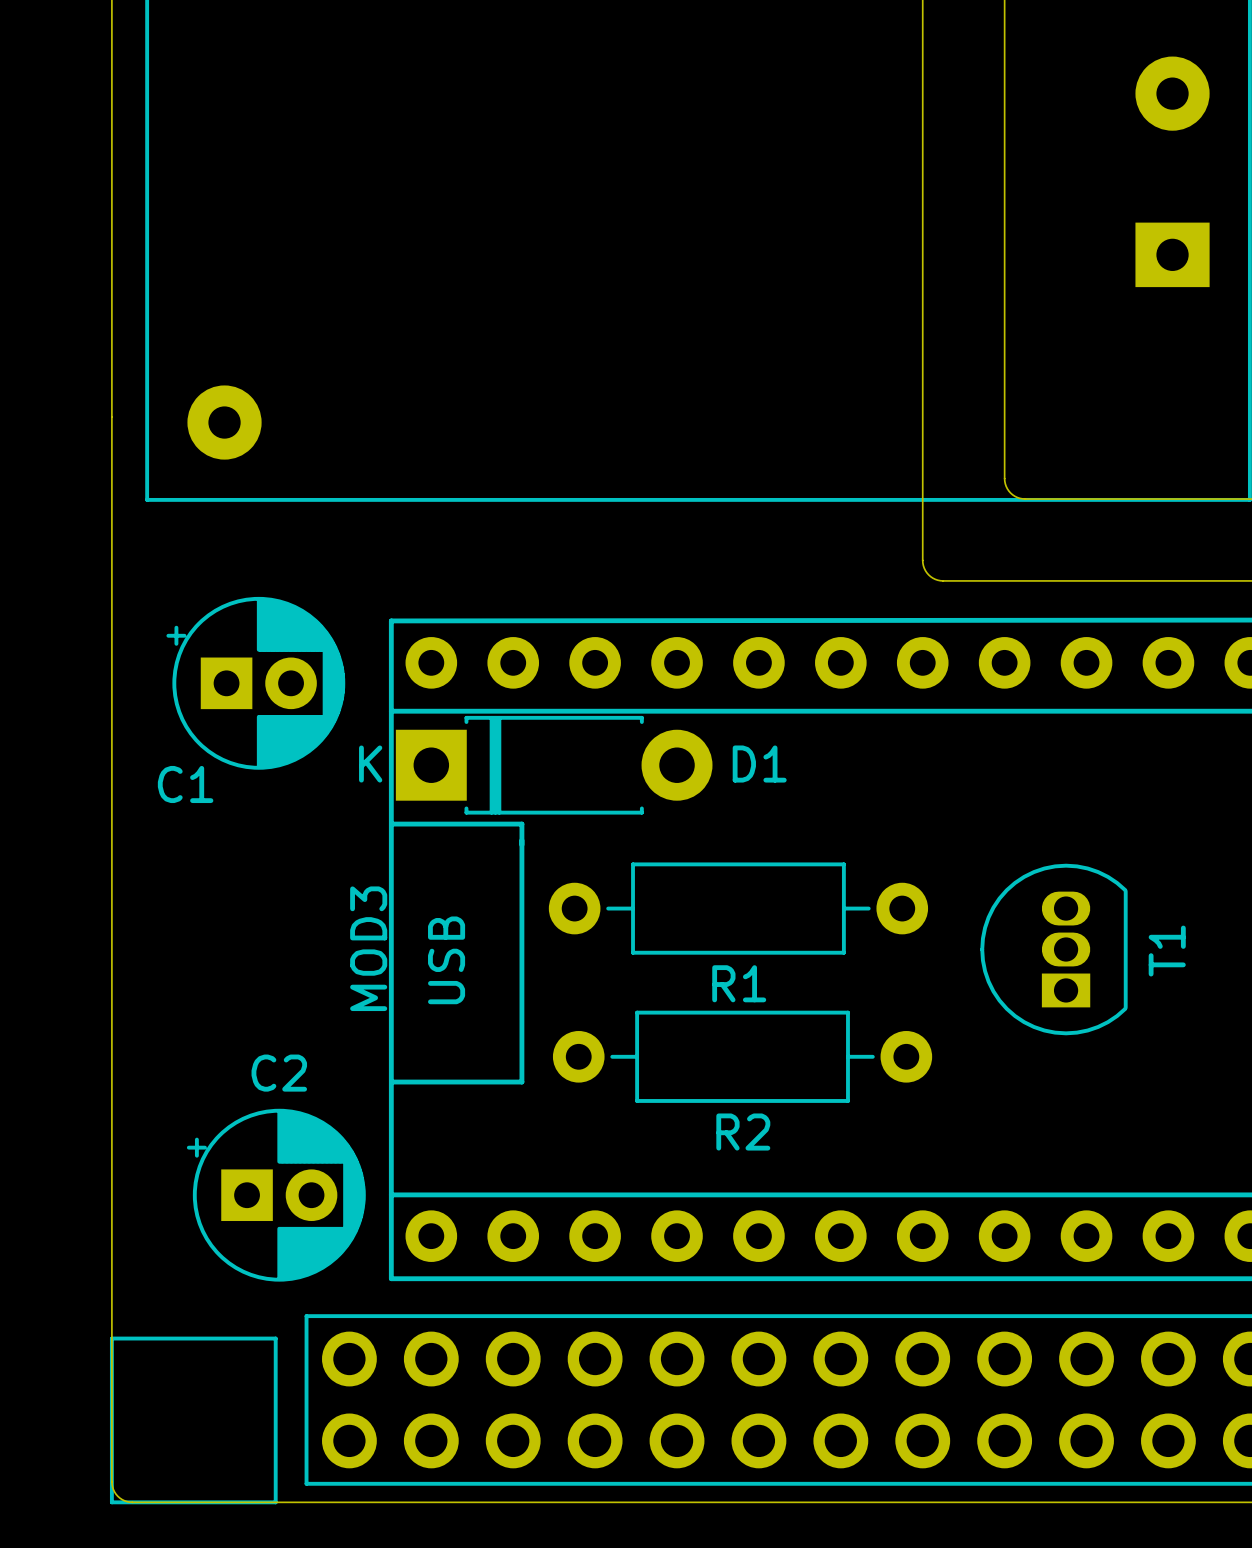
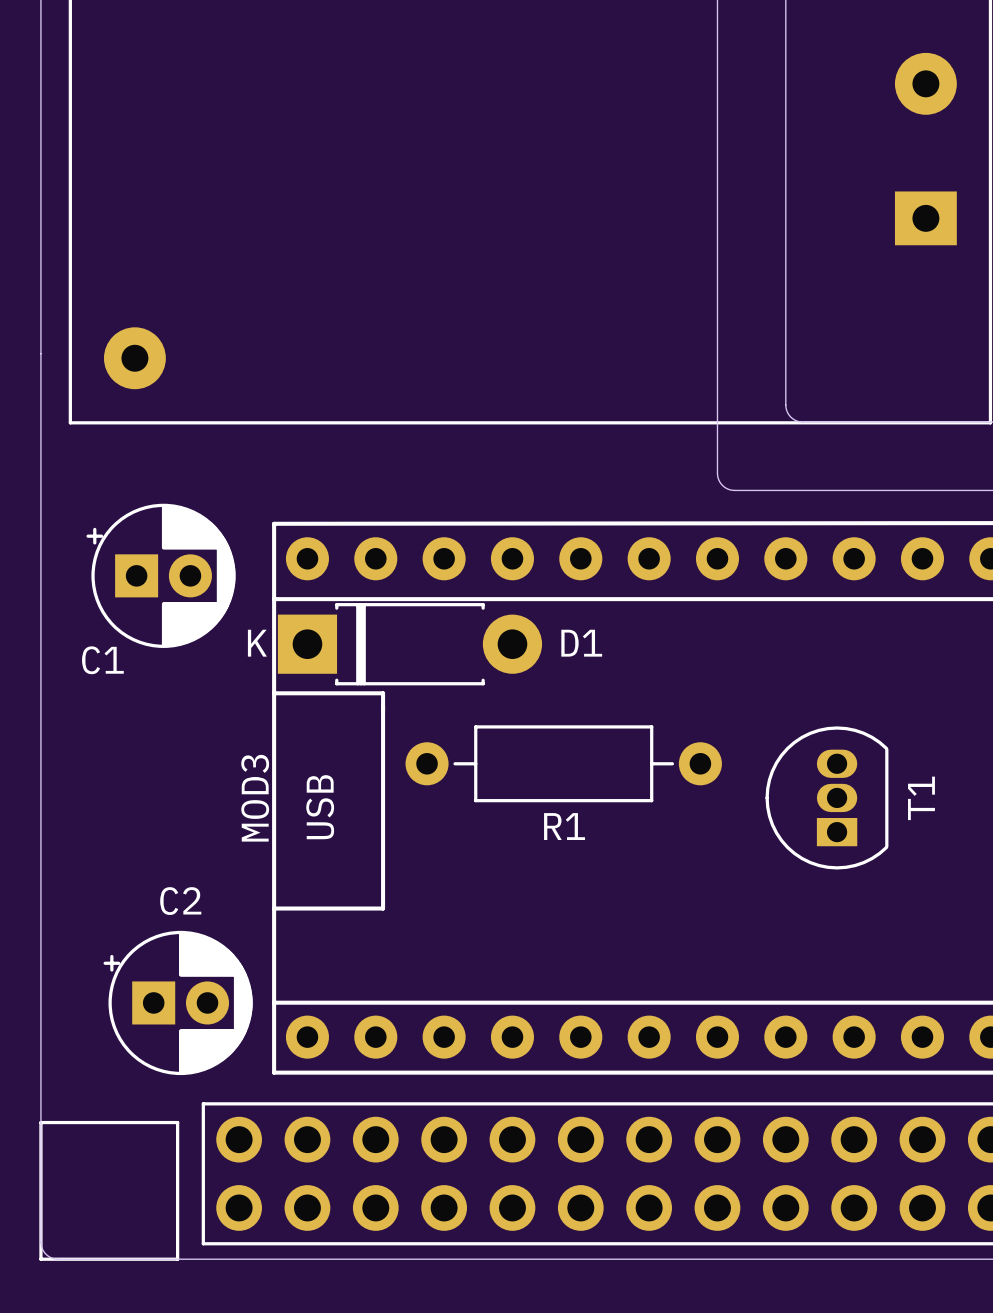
R2: (742, 1056) -> none

